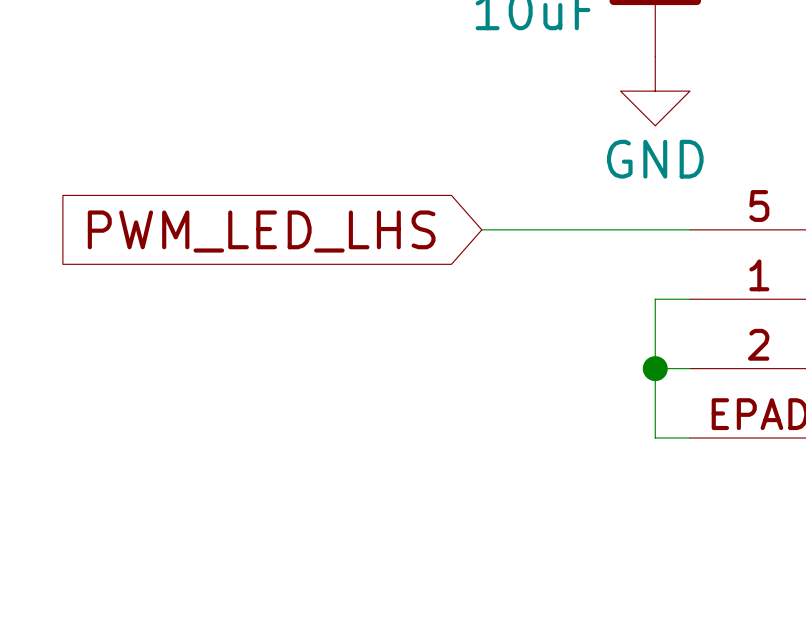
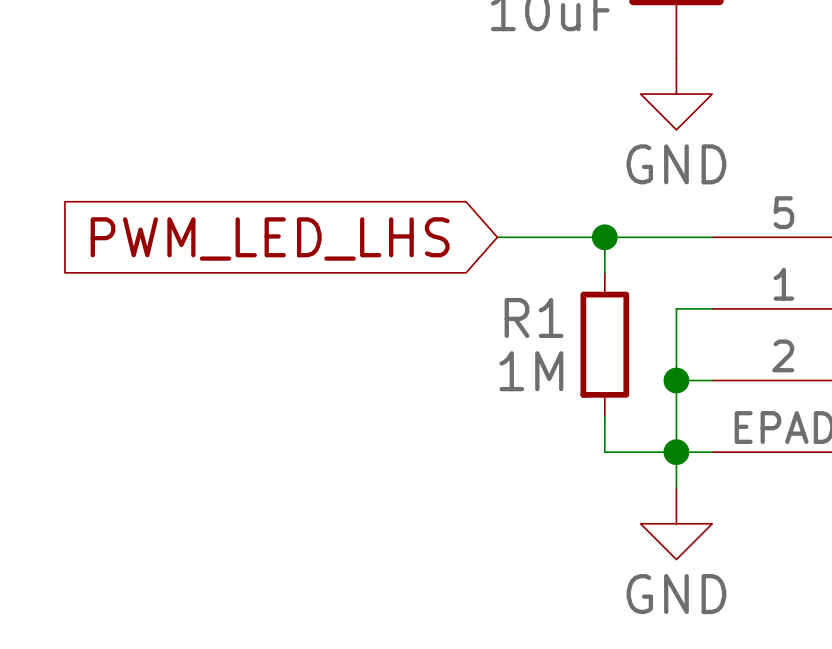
wire: none -> (604, 237) (604, 273)
junction: none -> (604, 237)
R1: none -> 1M (604, 344)
wire: none -> (604, 416) (604, 452) (676, 452) (676, 487)
junction: none -> (676, 452)
power symbol: none -> GND (676, 523)

